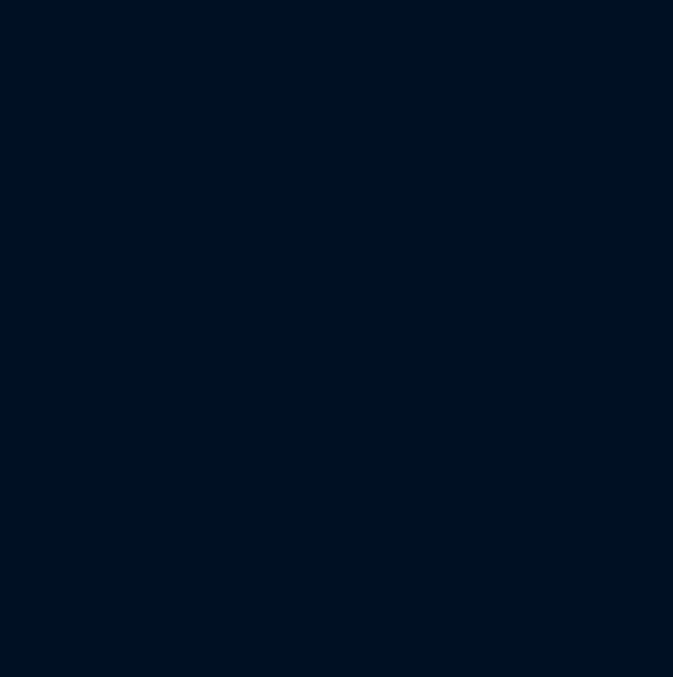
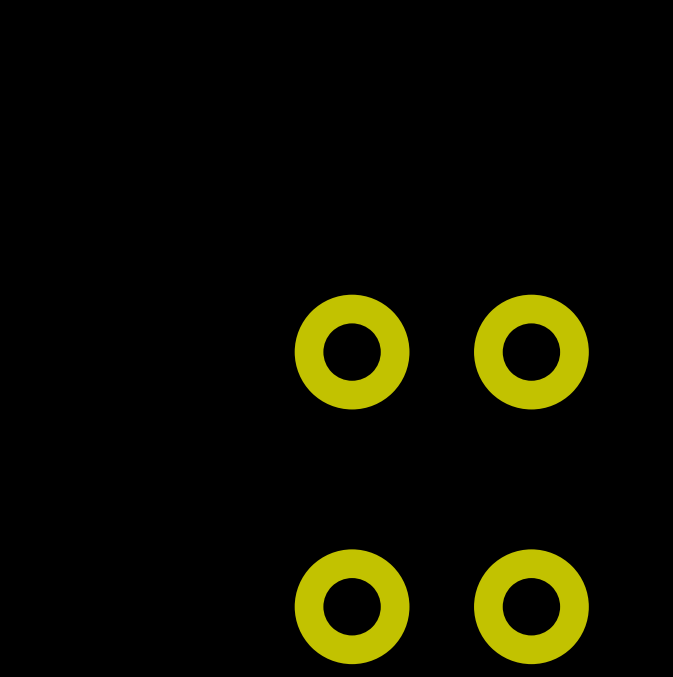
part: none -> (441, 352)
part: none -> (441, 606)

